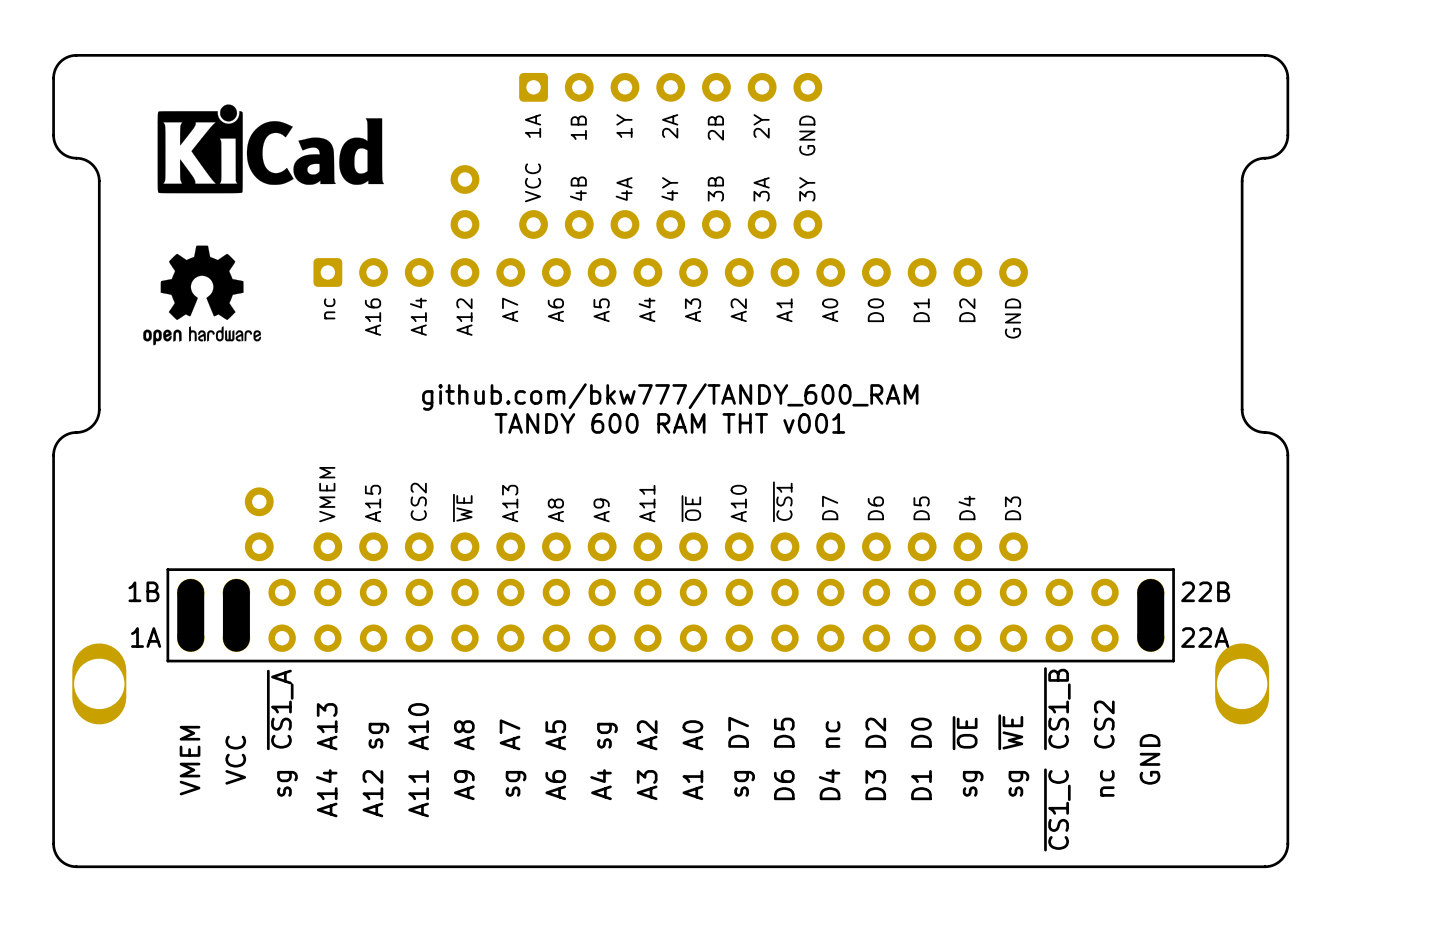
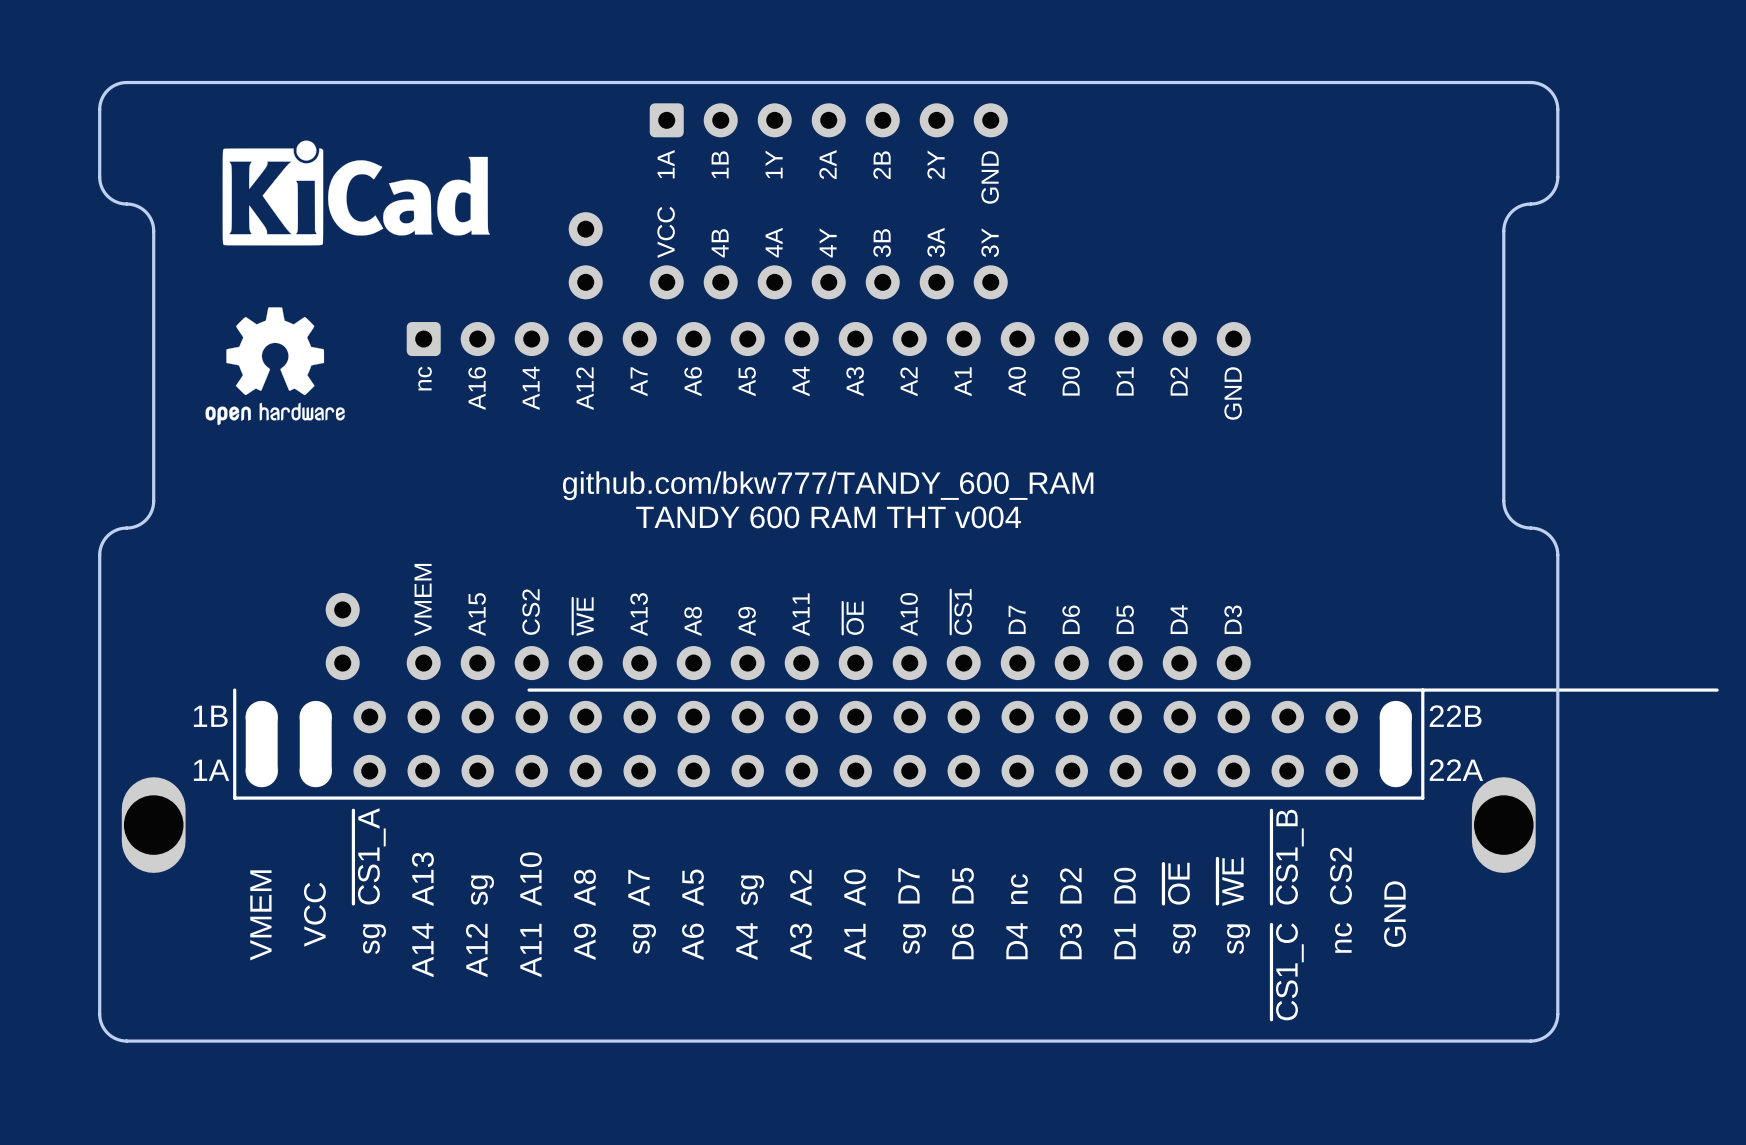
text: TANDY 600 RAM THT v001 (669, 423) -> TANDY 600 RAM THT v004 (828, 517)
line: (417, 569) (167, 569) -> none
line: none -> (1717, 690) (1422, 690)

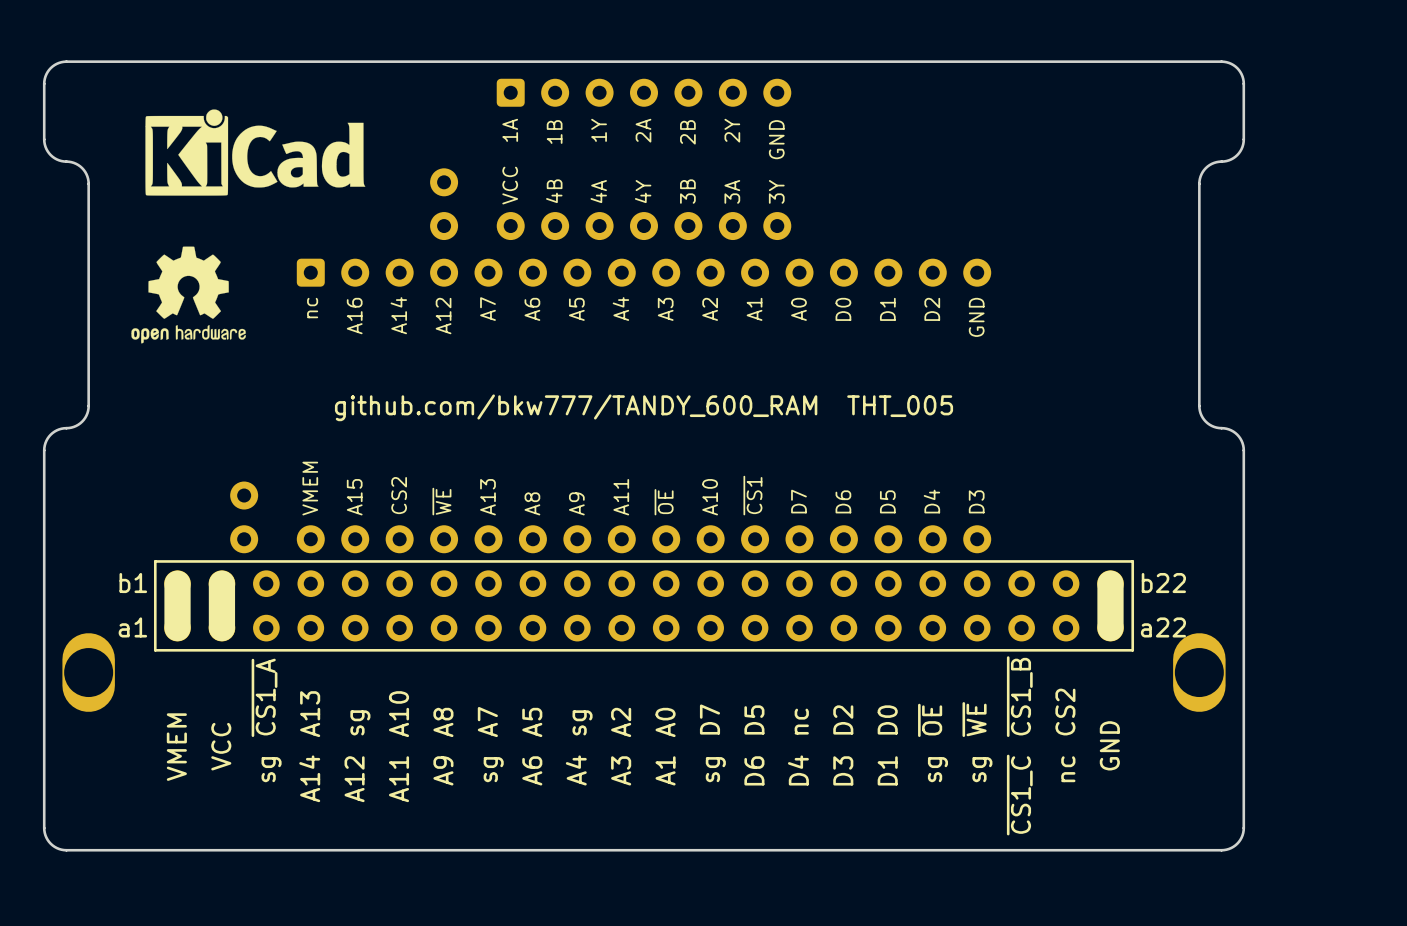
text: github.com/bkw777/TANDY_600_RAM (828, 485) -> github.com/bkw777/TANDY_600_RAM THT_005 (644, 407)
text: TANDY 600 RAM THT v004 (828, 517) -> none
line: none -> (397, 561) (155, 561)
line: (1717, 690) (1422, 690) -> none
text: 1B (210, 716) -> b1 (133, 583)
text: 22B (1455, 716) -> b22 (1163, 583)
text: 1A (211, 770) -> a1 (132, 627)
text: 22A (1456, 770) -> a22 (1163, 627)

